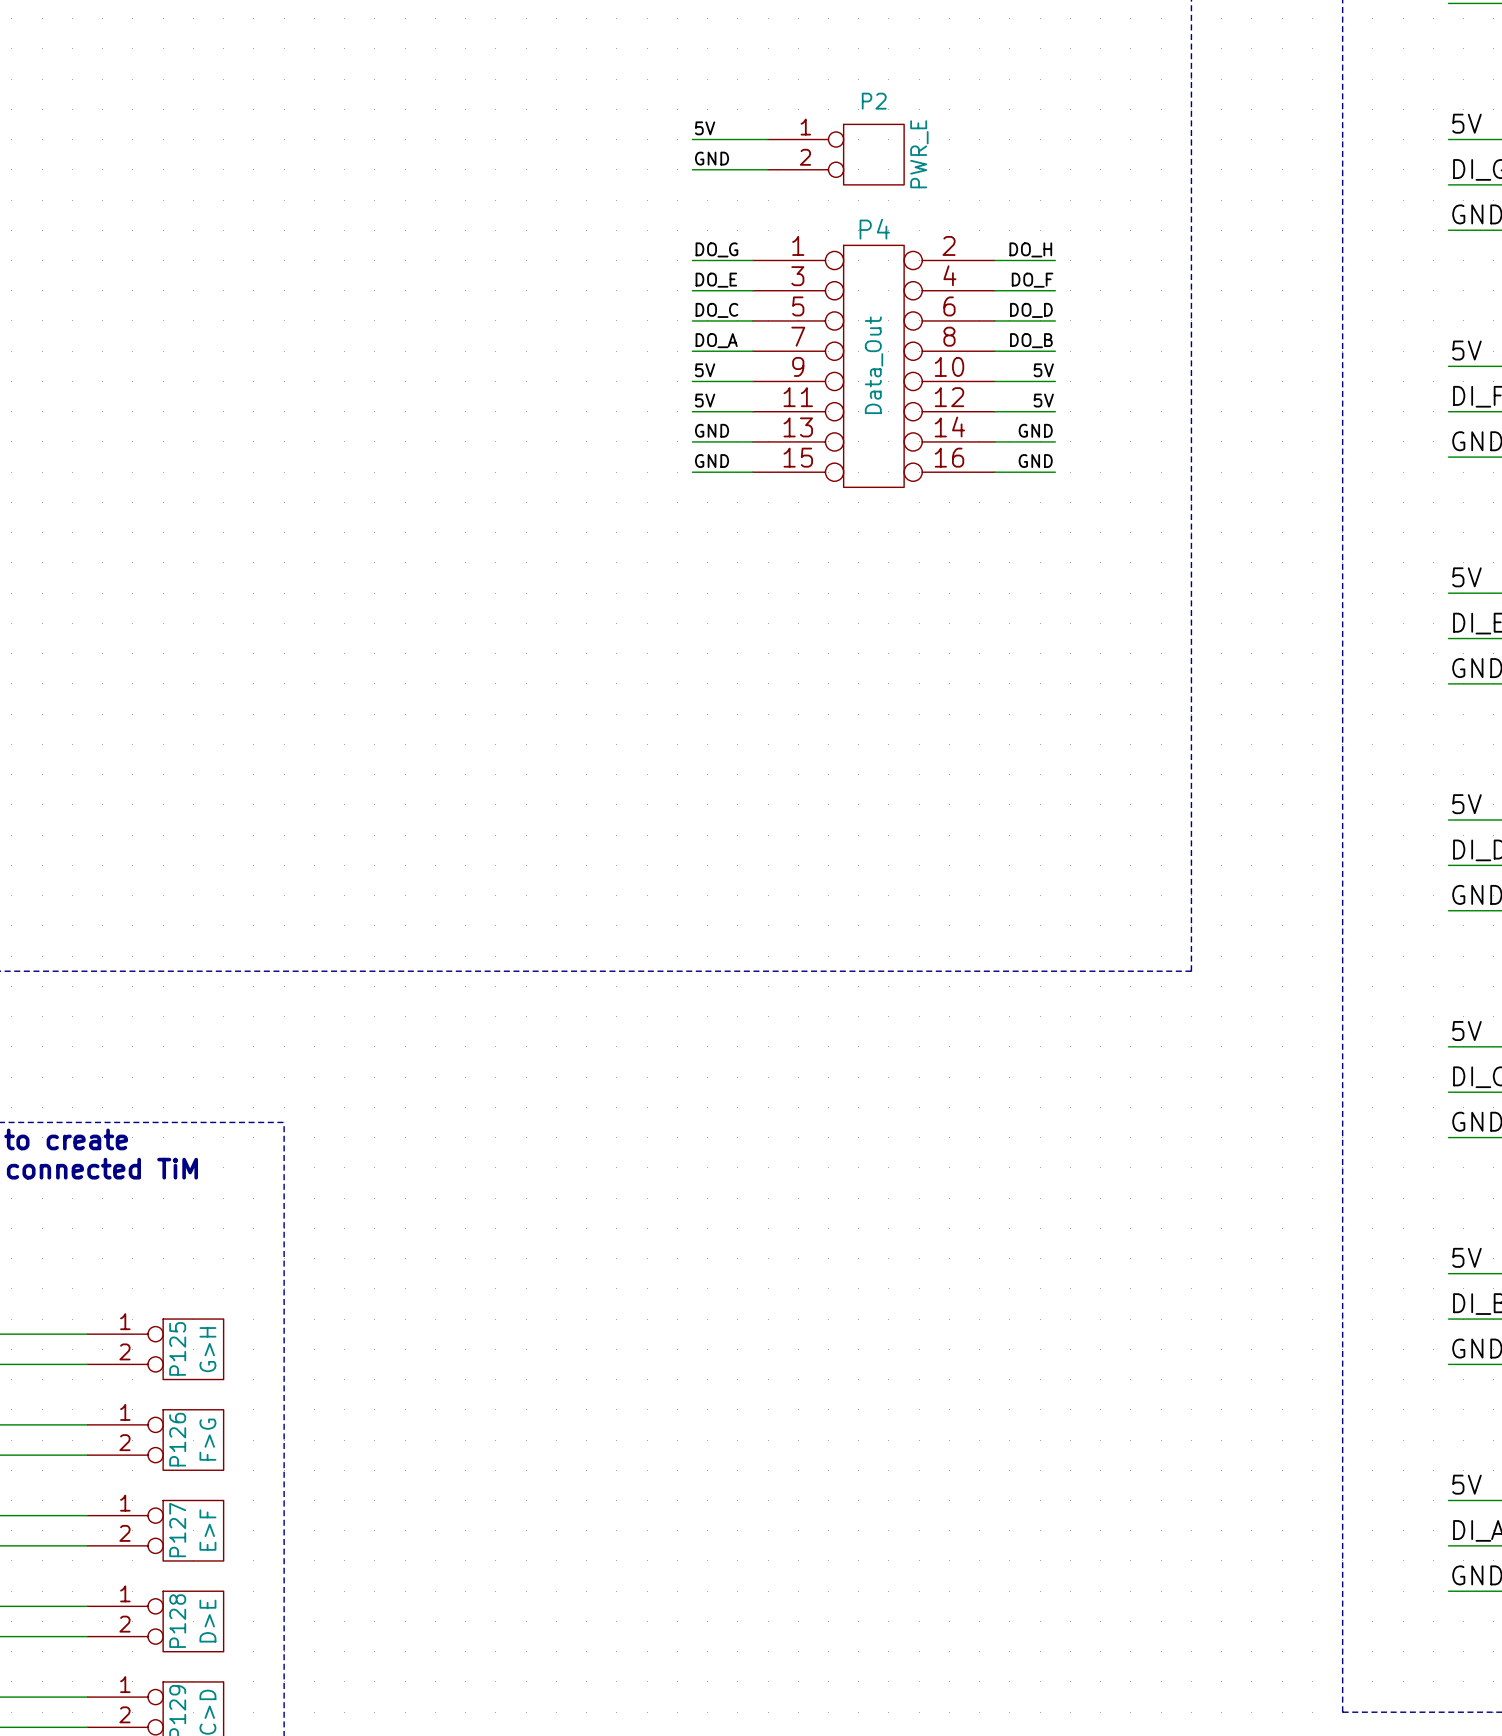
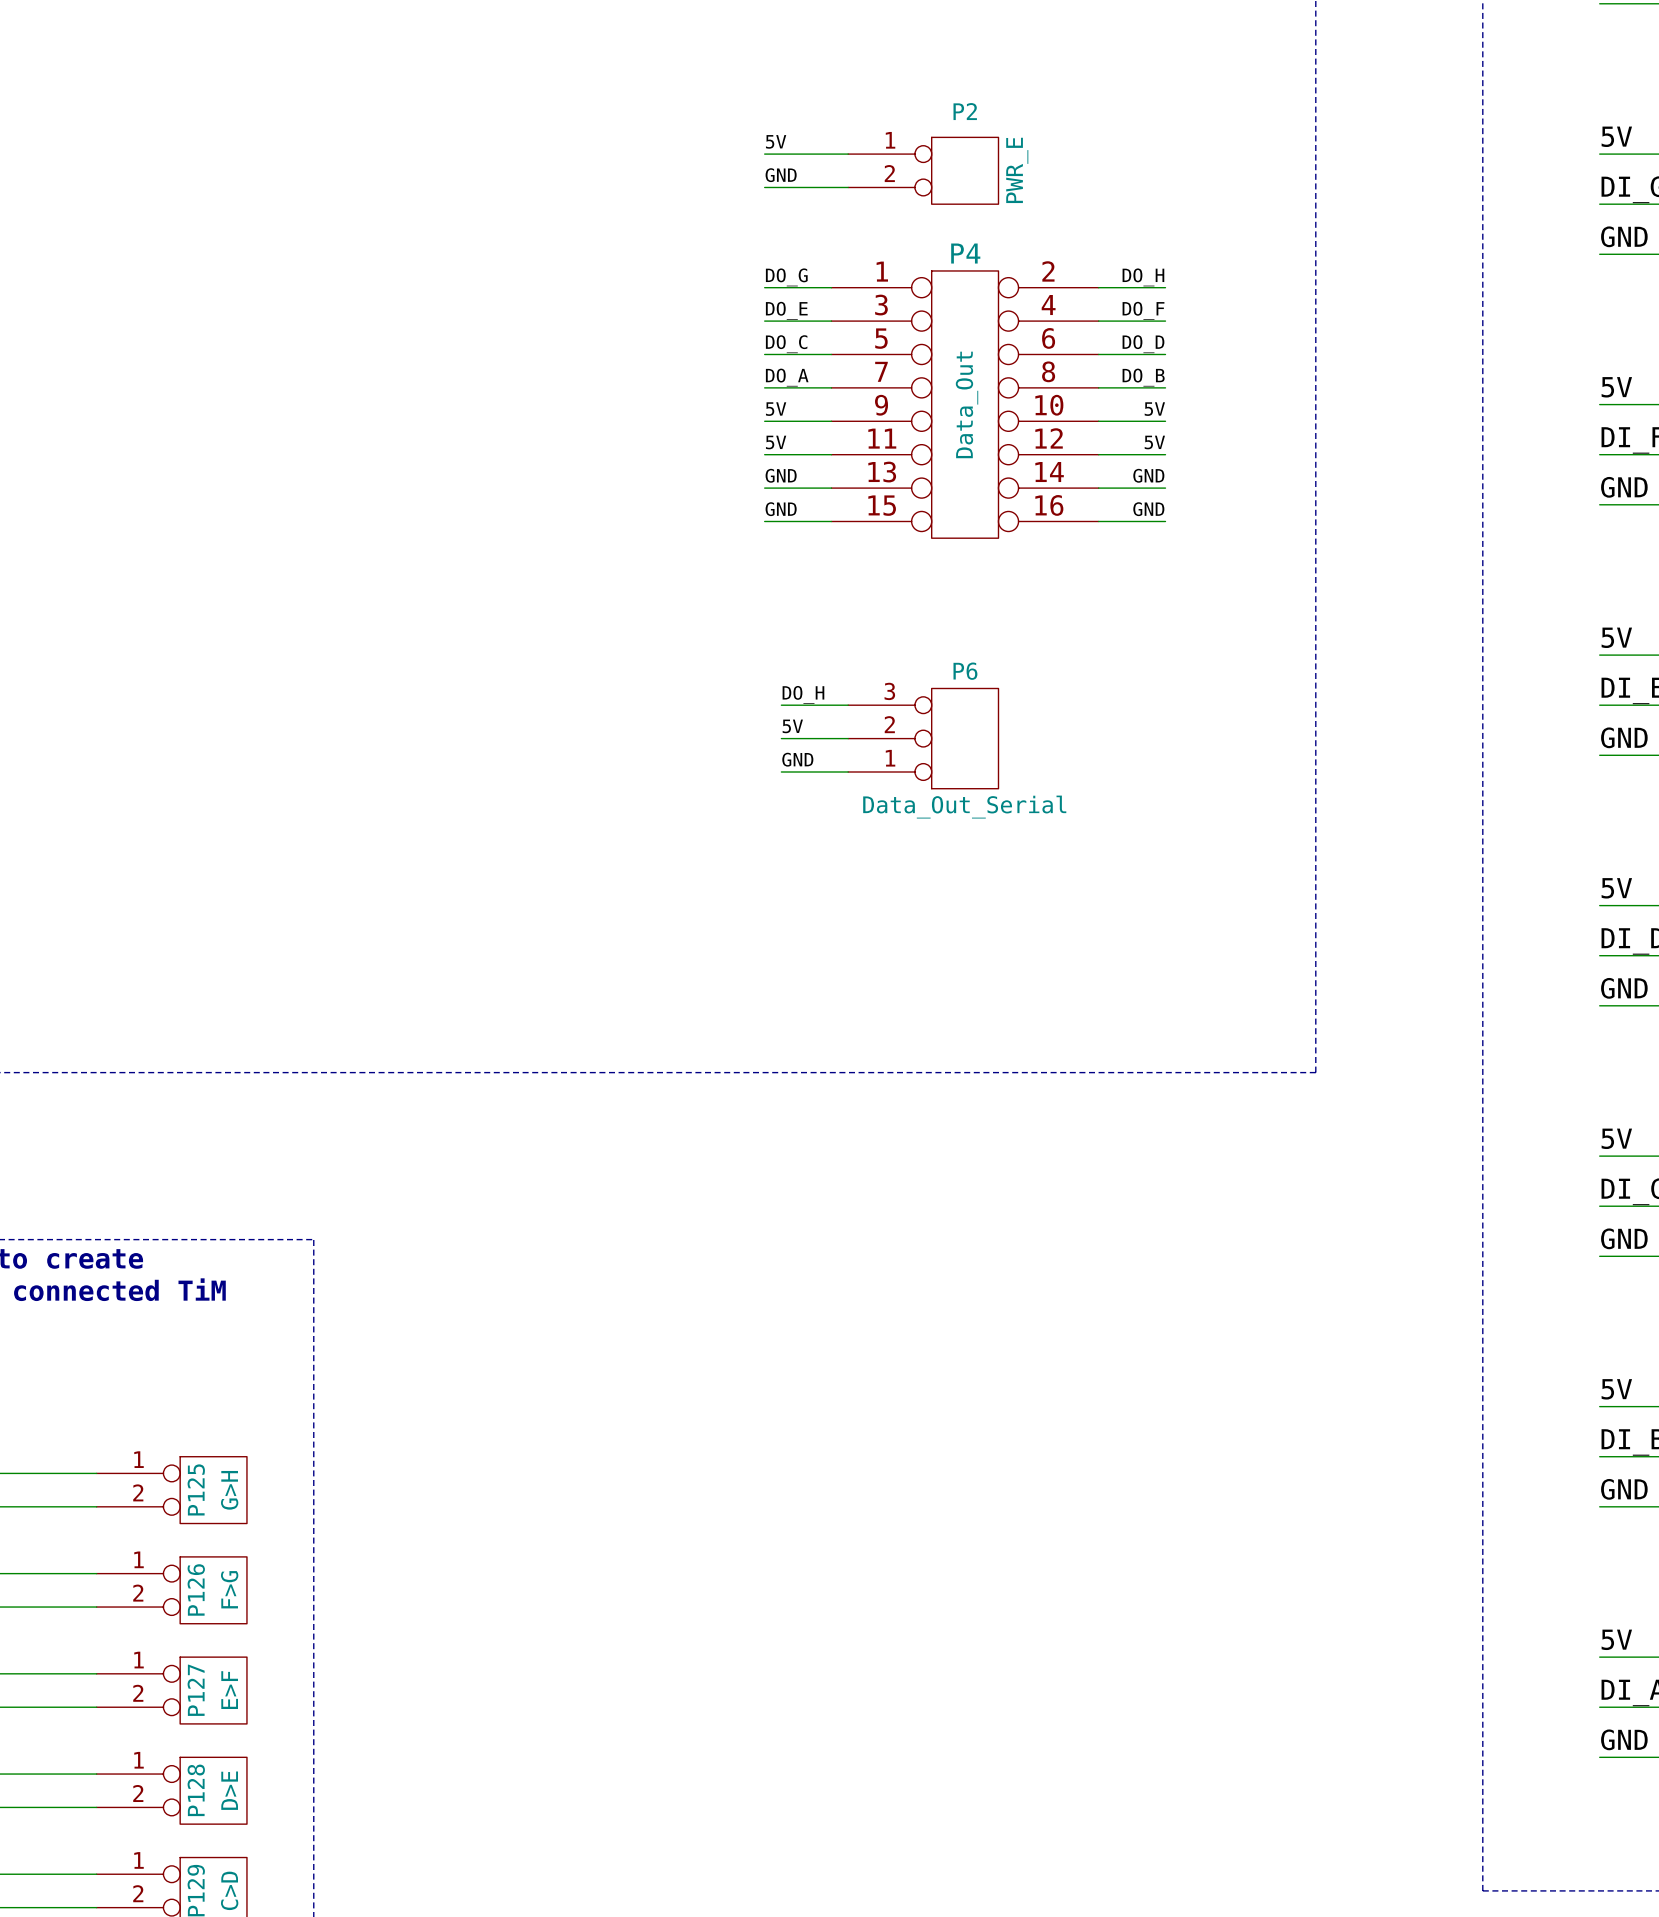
label: none -> DO_H (803, 694)
wire: none -> (781, 705) (848, 705)
label: none -> 5V (792, 726)
wire: none -> (781, 738) (848, 738)
P6: none -> Data_Out_Serial (923, 738)
label: none -> GND (797, 759)
wire: none -> (781, 772) (848, 772)

